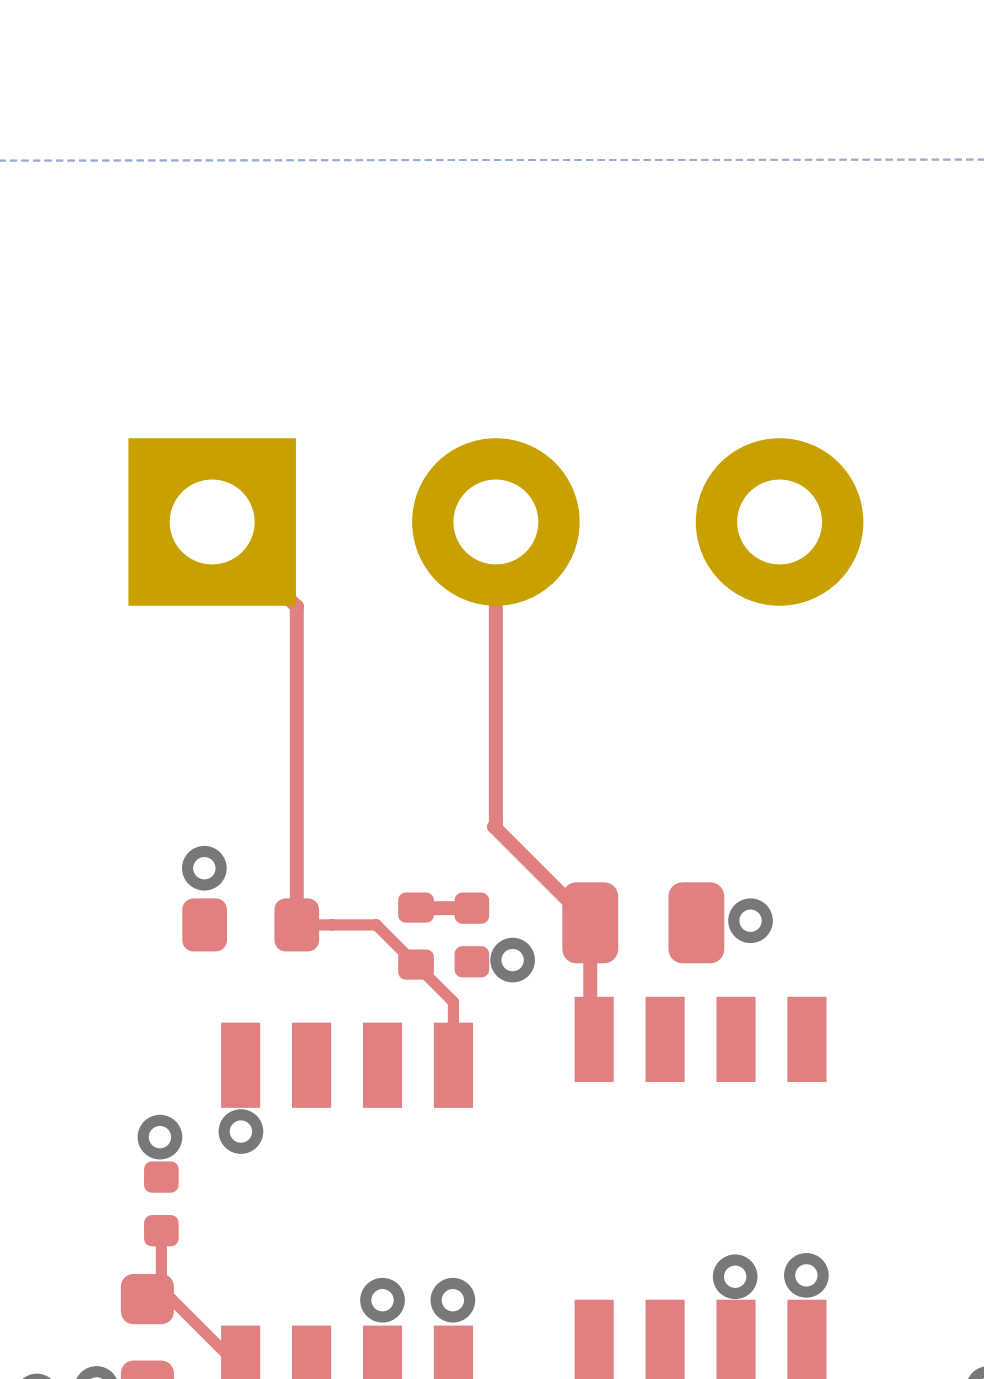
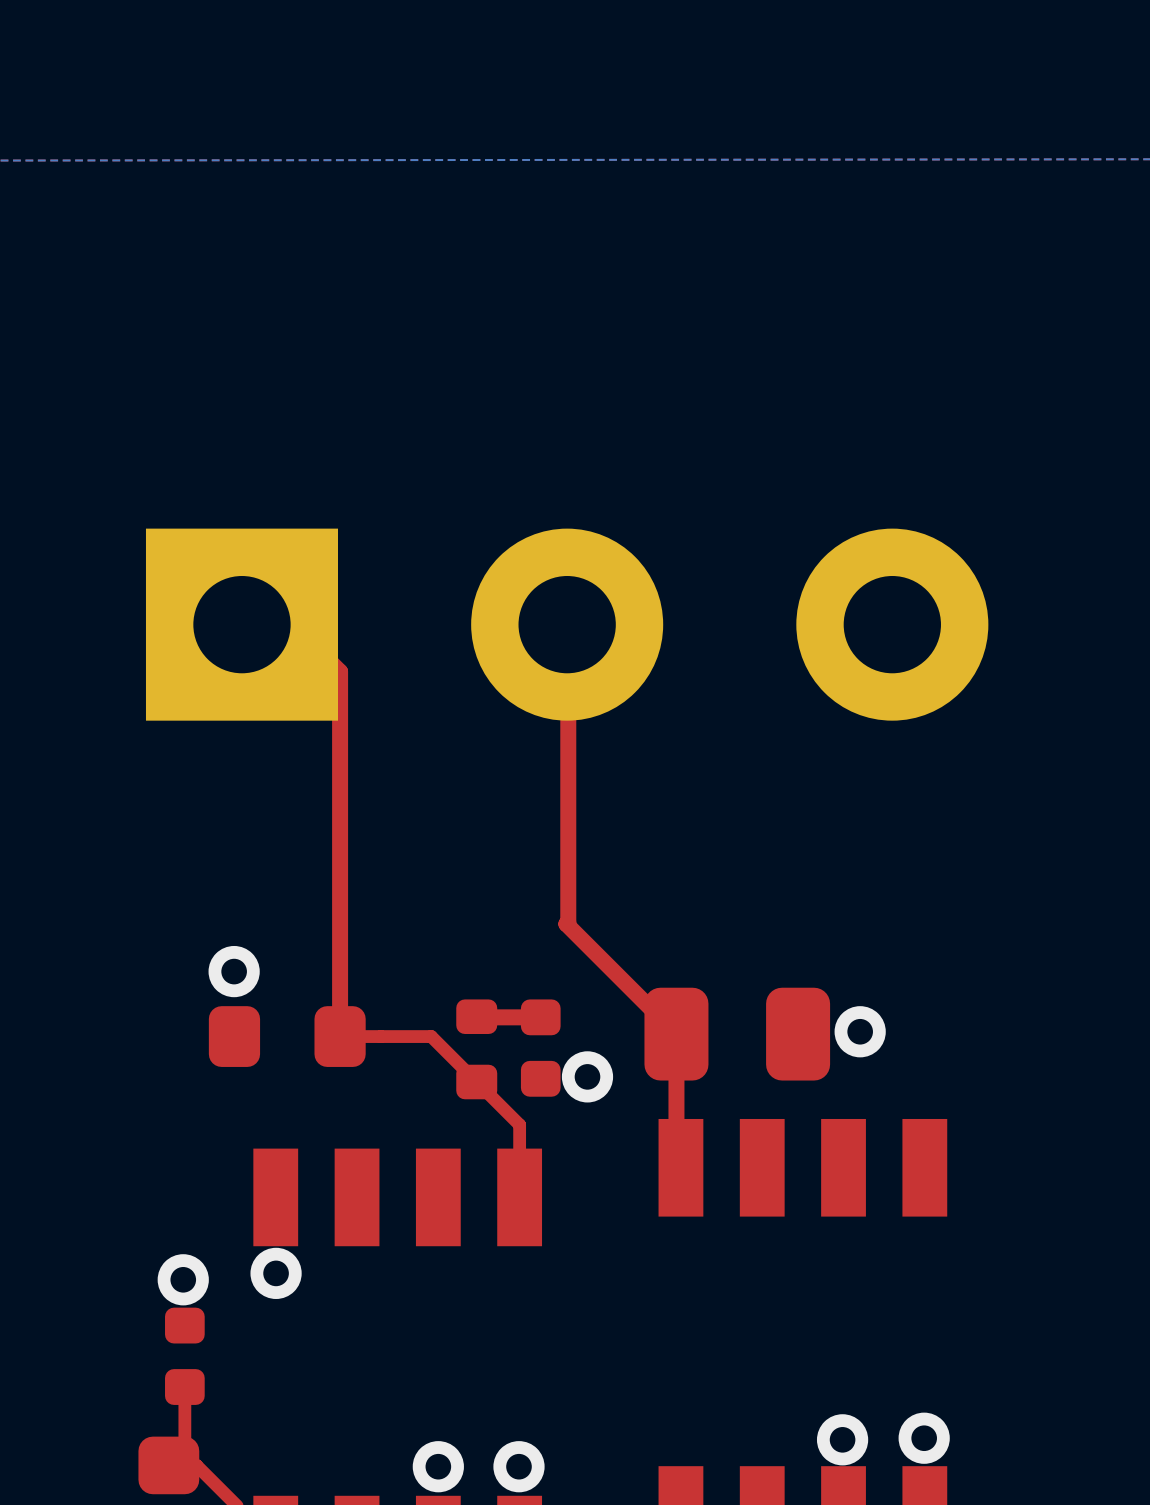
part position: (495, 521) -> (567, 624)

